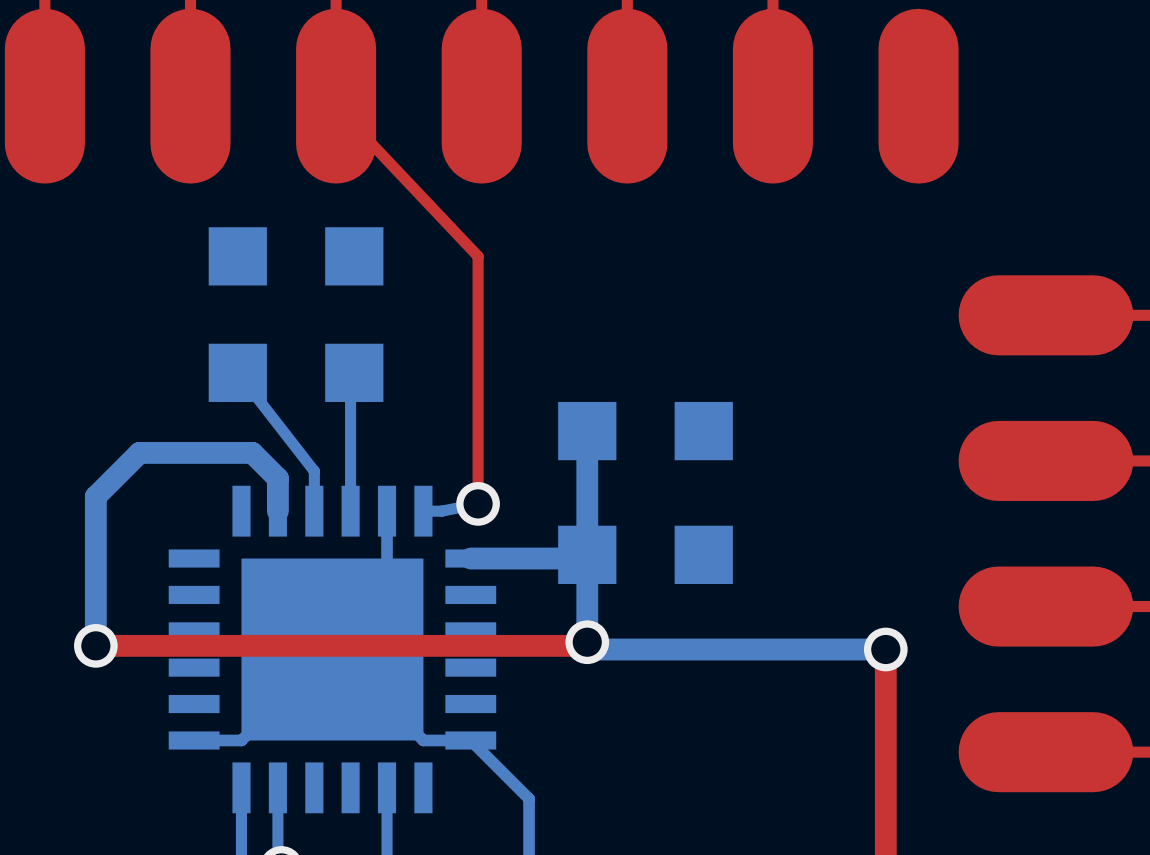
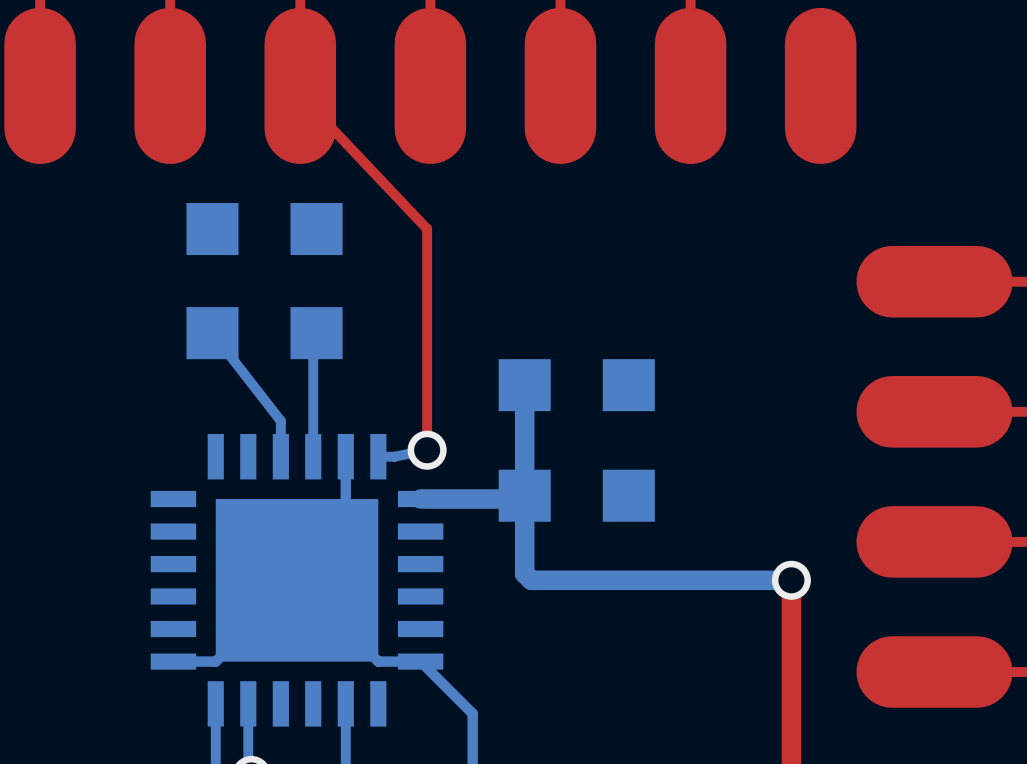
bottom track: (277, 511) (277, 478) (252, 452) (139, 452) (95, 496) (95, 645) -> none
top track: (587, 642) (583, 645) (95, 645) -> none
via: (587, 642) -> none
via: (95, 645) -> none

